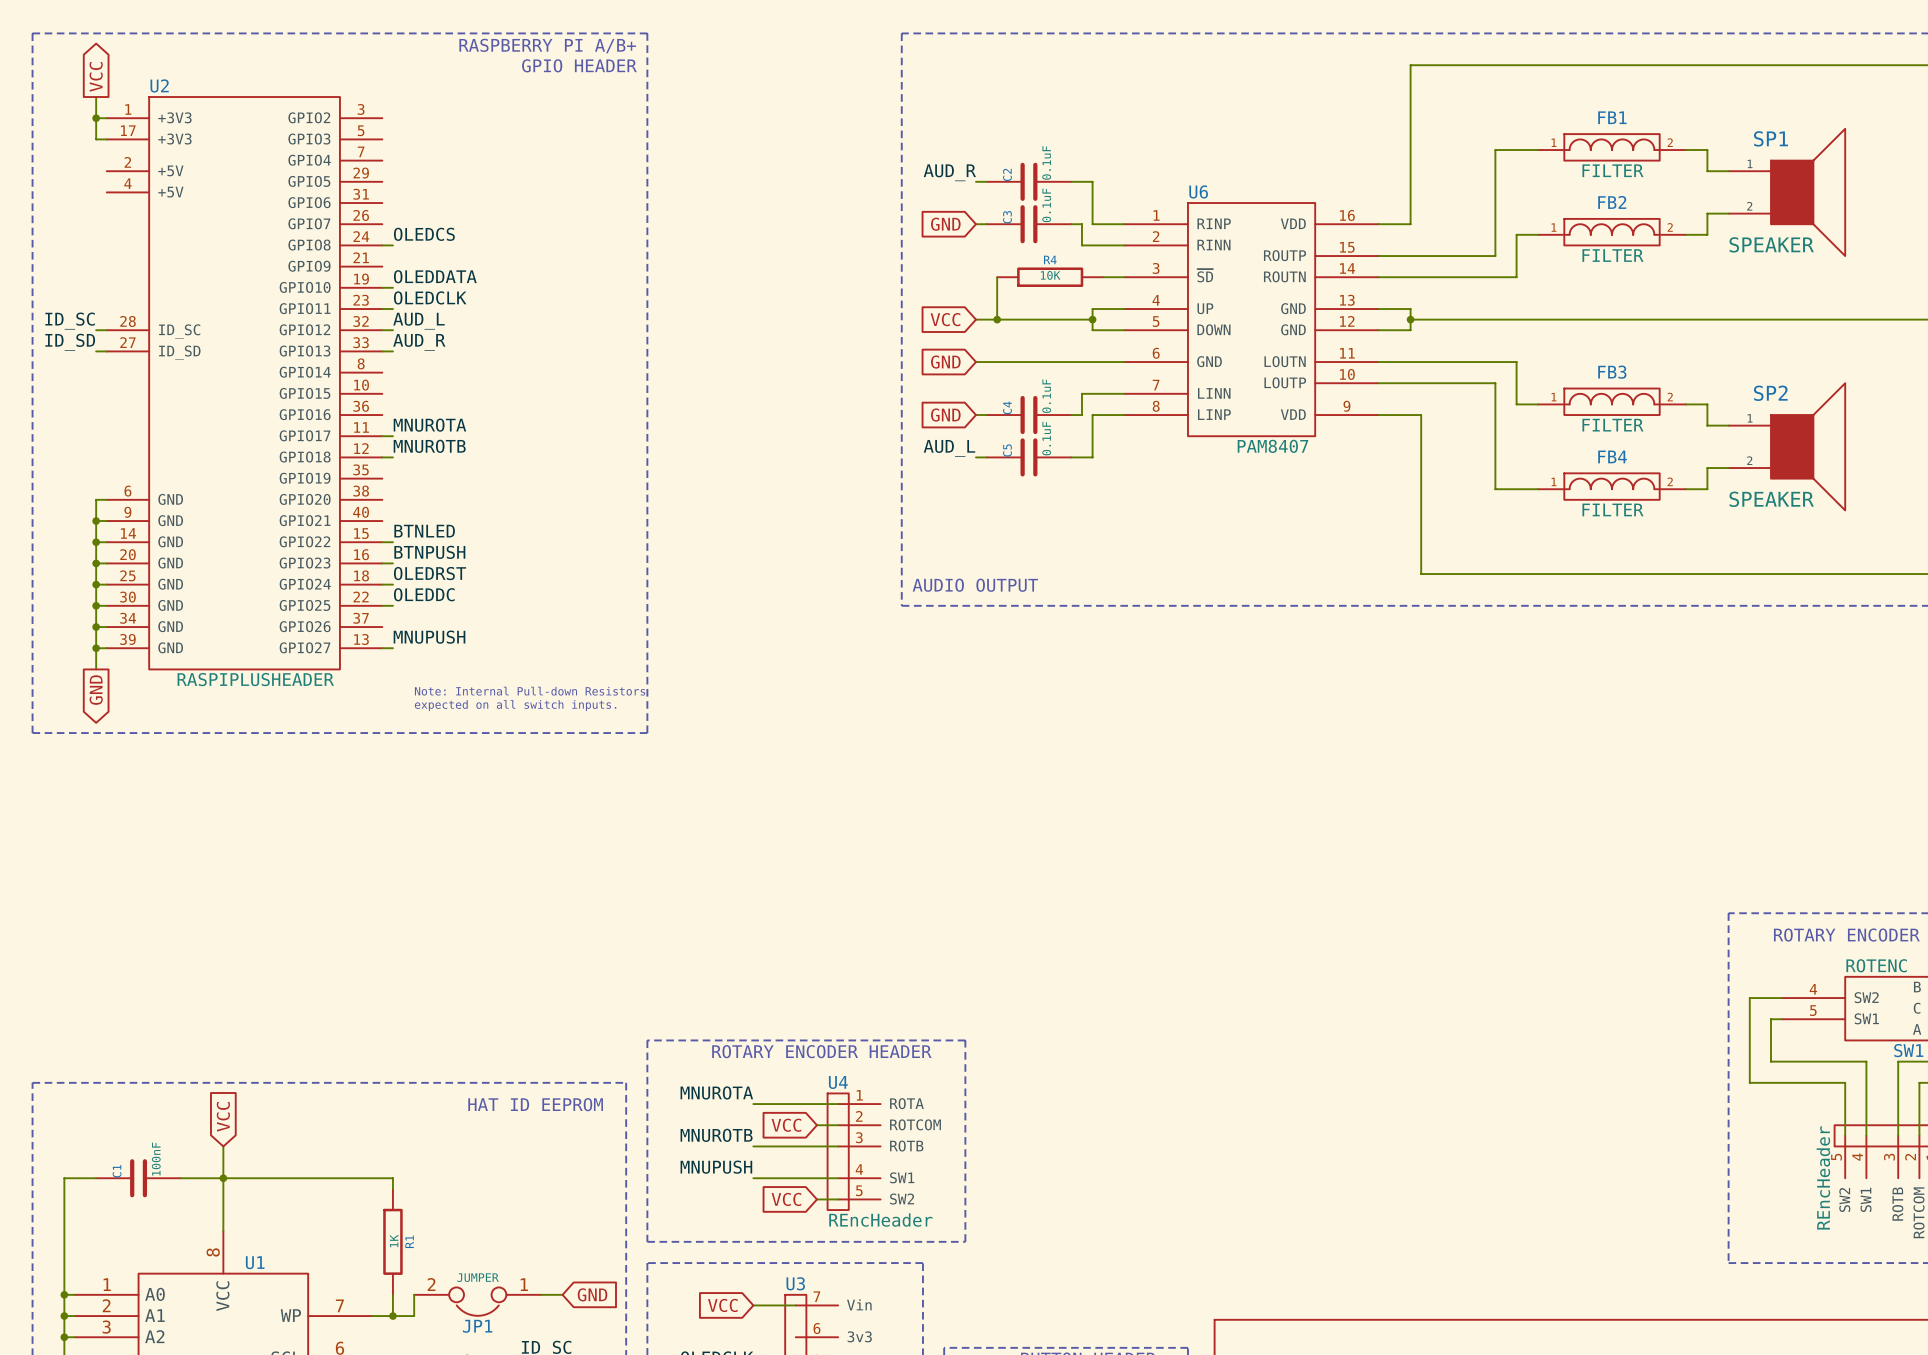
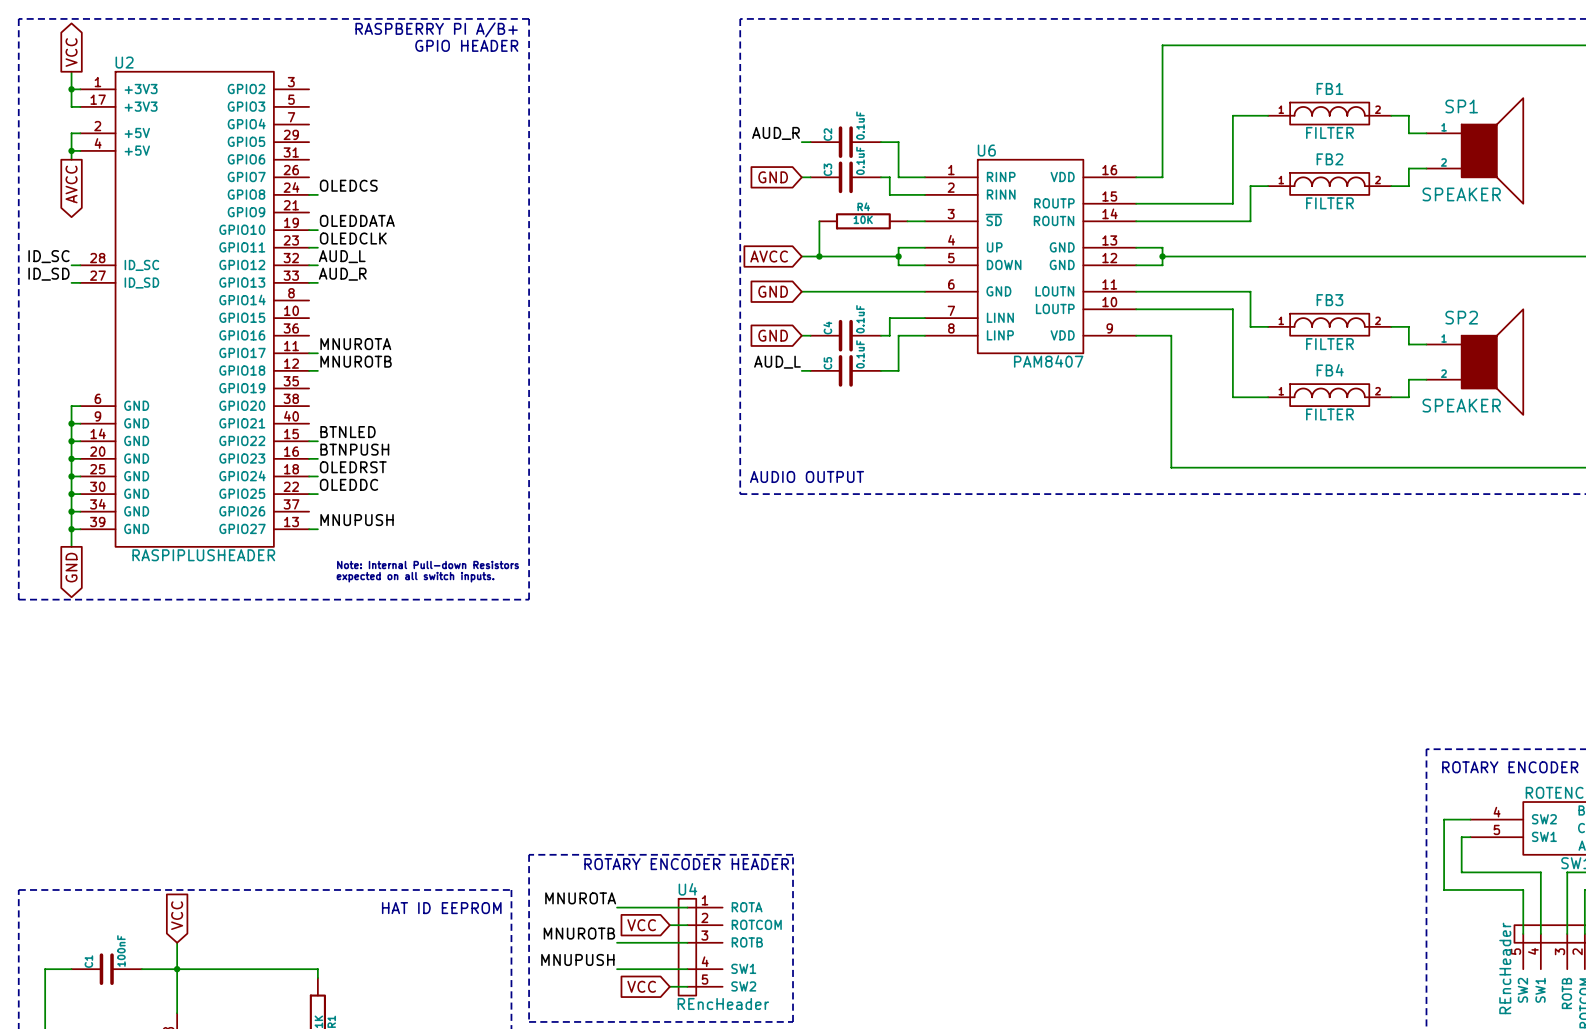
wire: none -> (80, 133) (71, 133) (71, 159)
wire: none -> (71, 150) (80, 150)
junction: none -> (71, 150)
global label: none -> AVCC (71, 184)
global label: VCC (945, 319) -> AVCC (769, 256)

